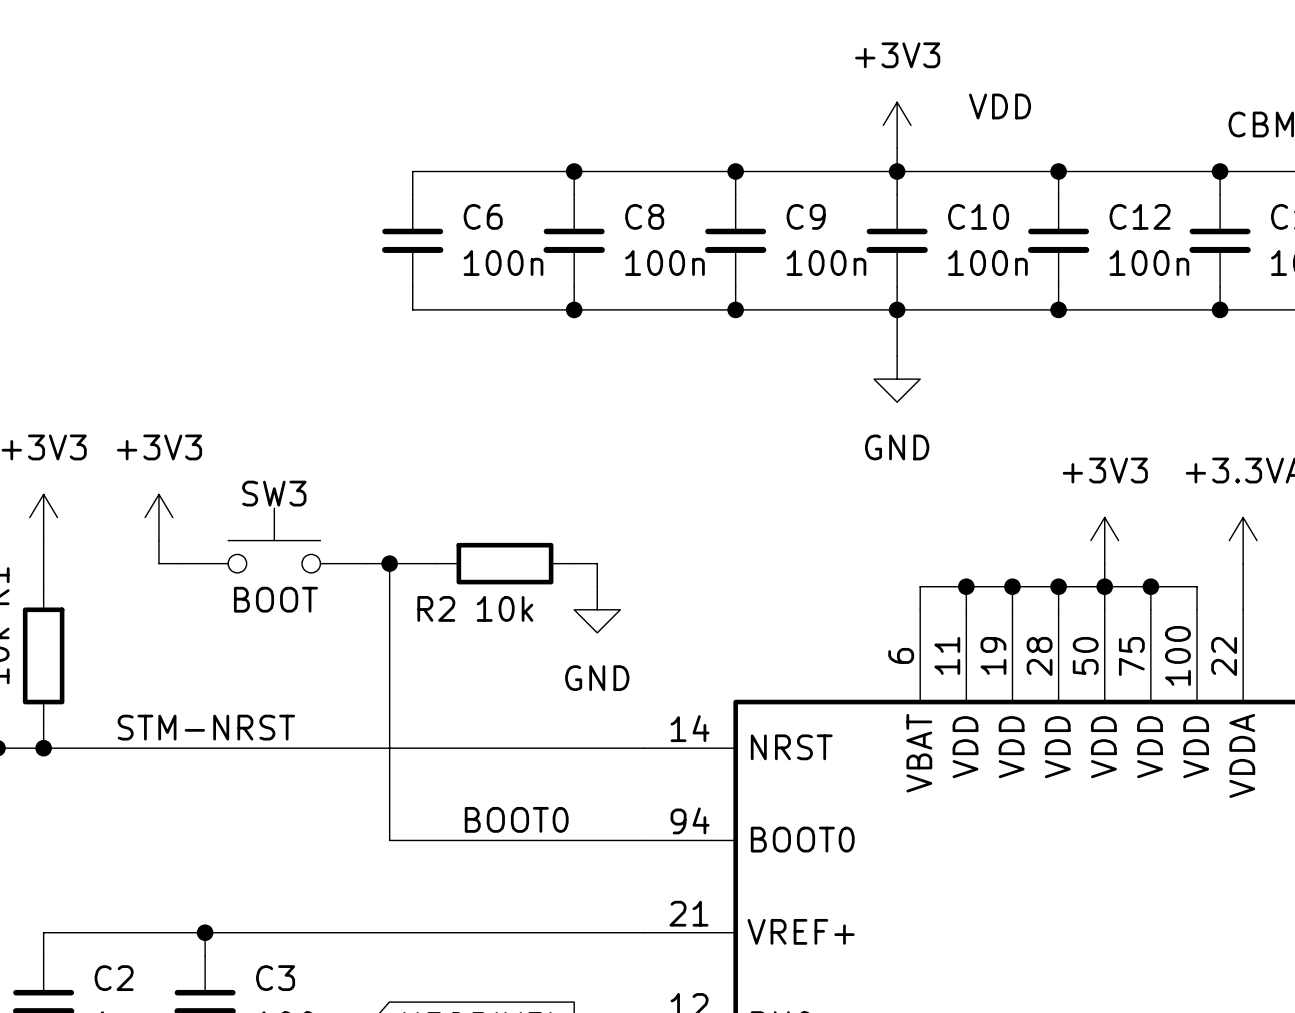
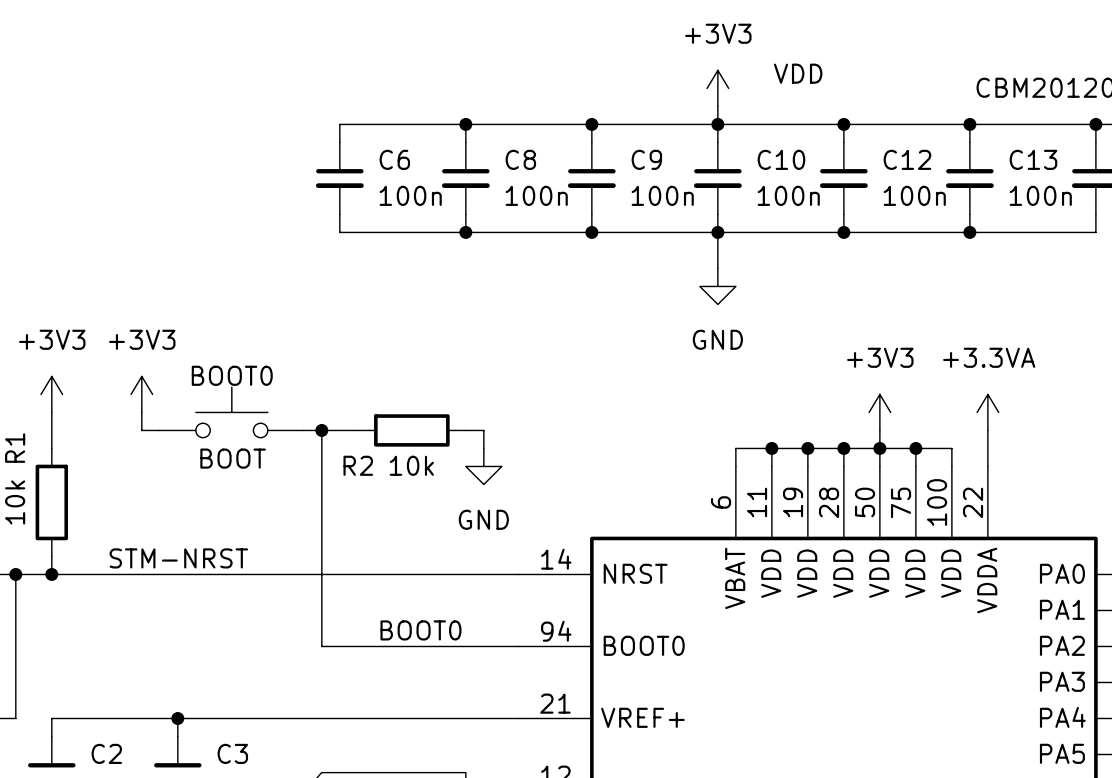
SW3 name: SW3 (274, 493) -> BOOT0 (232, 375)

